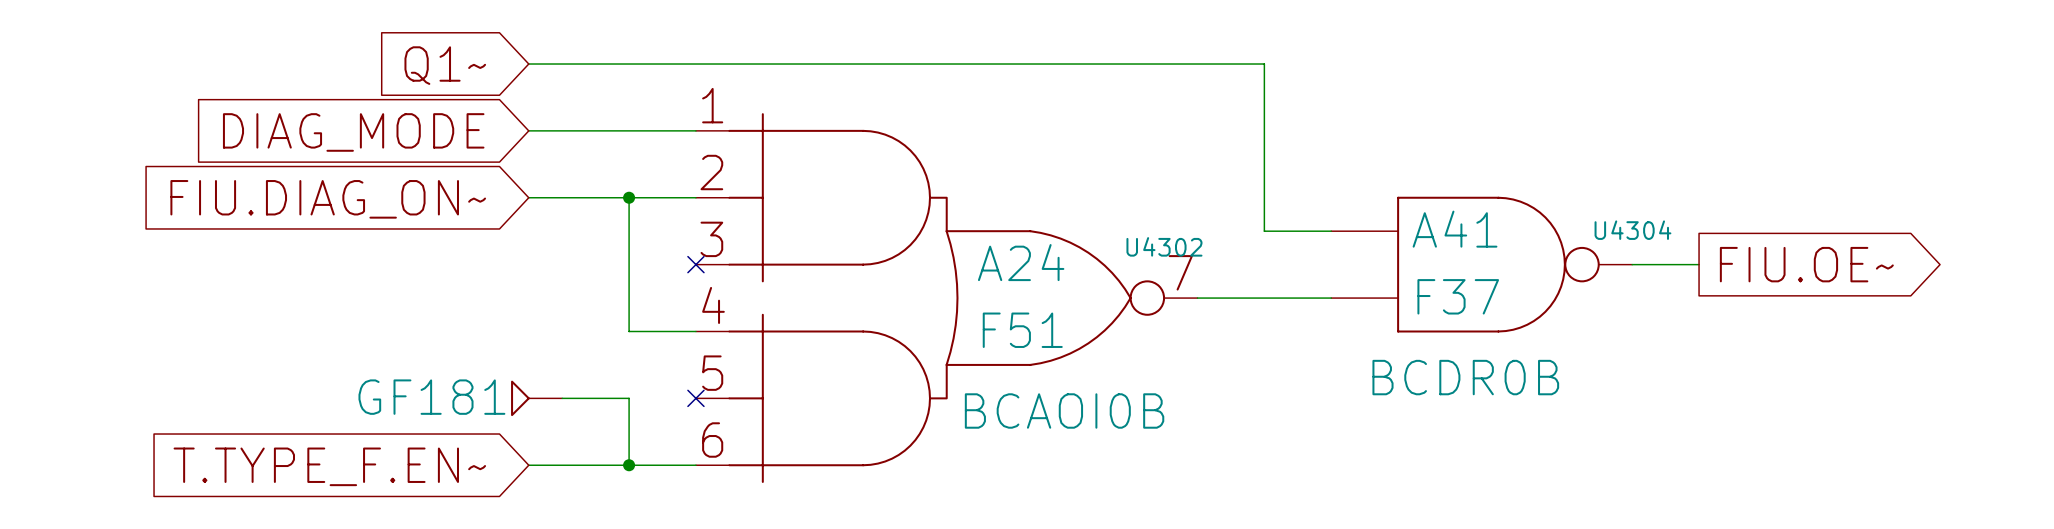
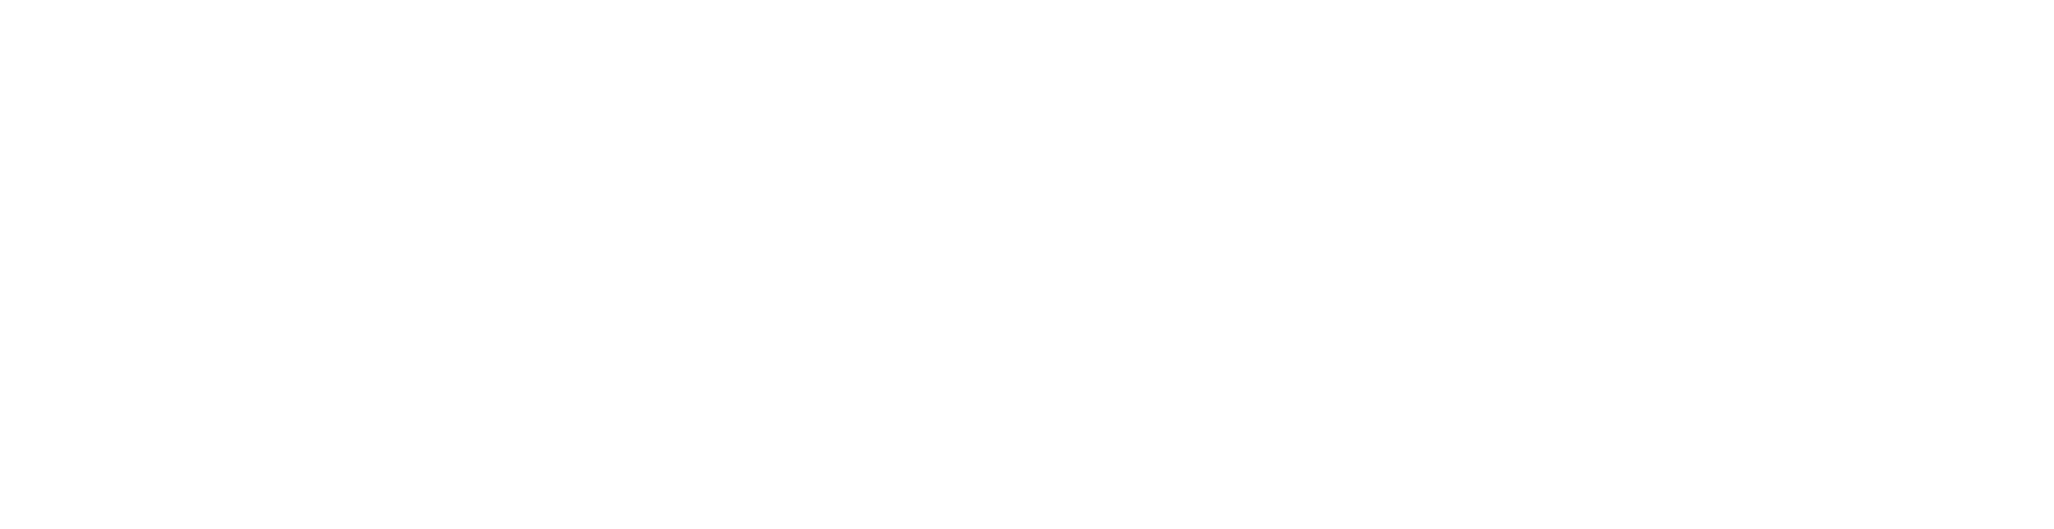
wire: (528, 64) (1264, 64) (1264, 231) (1331, 231) -> none
global label: Q1~ (445, 65) -> none
wire: (528, 130) (695, 130) -> none
global label: DIAG_MODE (353, 132) -> none
wire: (528, 197) (695, 197) -> none
wire: (629, 197) (629, 331) (695, 331) -> none
junction: (629, 197) -> none
global label: FIU.DIAG_ON~ (328, 199) -> none
no-connect mark: (695, 264) -> none
U4304: F37 (1481, 264) -> none
wire: (1632, 264) (1699, 264) -> none
global label: FIU.OE~ (1806, 264) -> none
U4302: F51 (946, 298) -> none
wire: (1197, 298) (1331, 298) -> none
GF181: (536, 398) -> none
wire: (562, 398) (629, 398) (629, 465) -> none
no-connect mark: (695, 398) -> none
wire: (528, 465) (695, 465) -> none
junction: (629, 465) -> none
global label: T.TYPE_F.EN~ (329, 466) -> none

